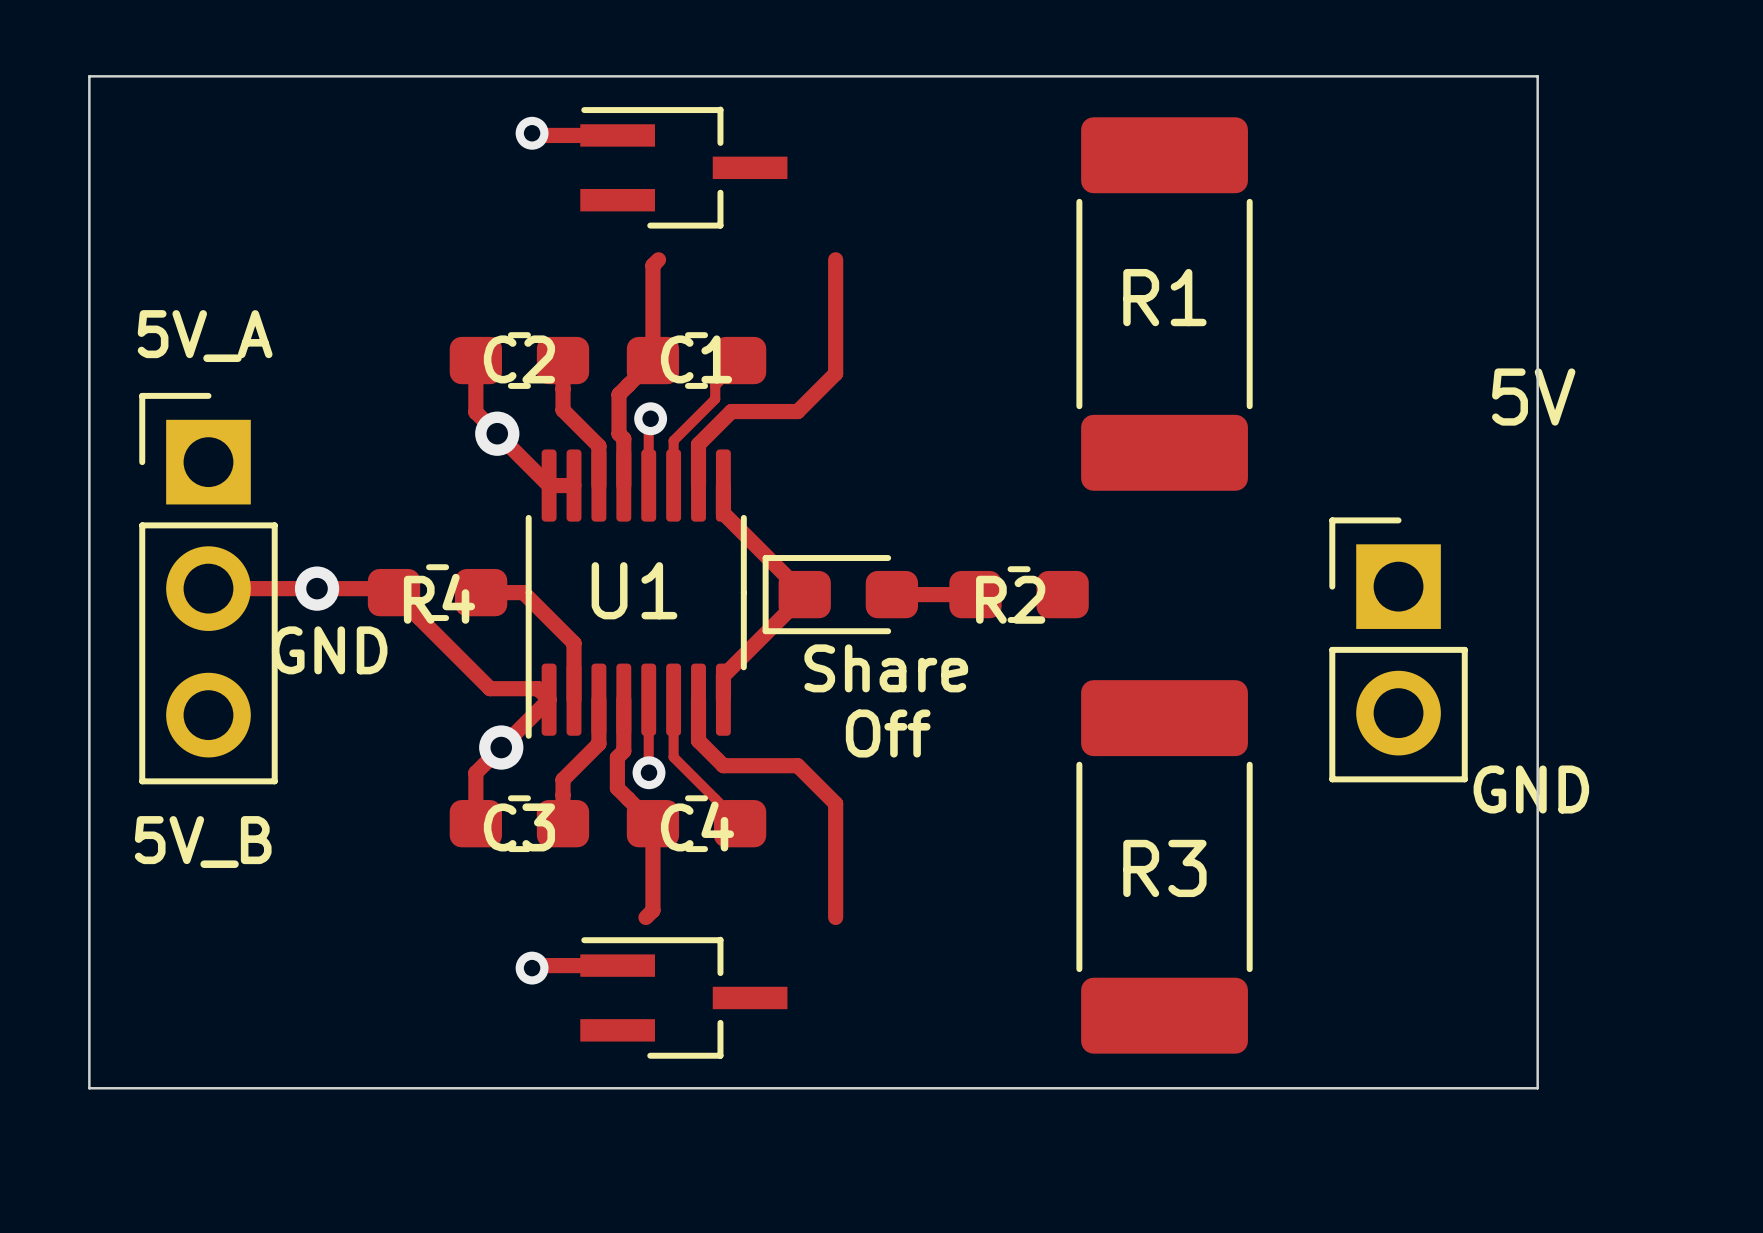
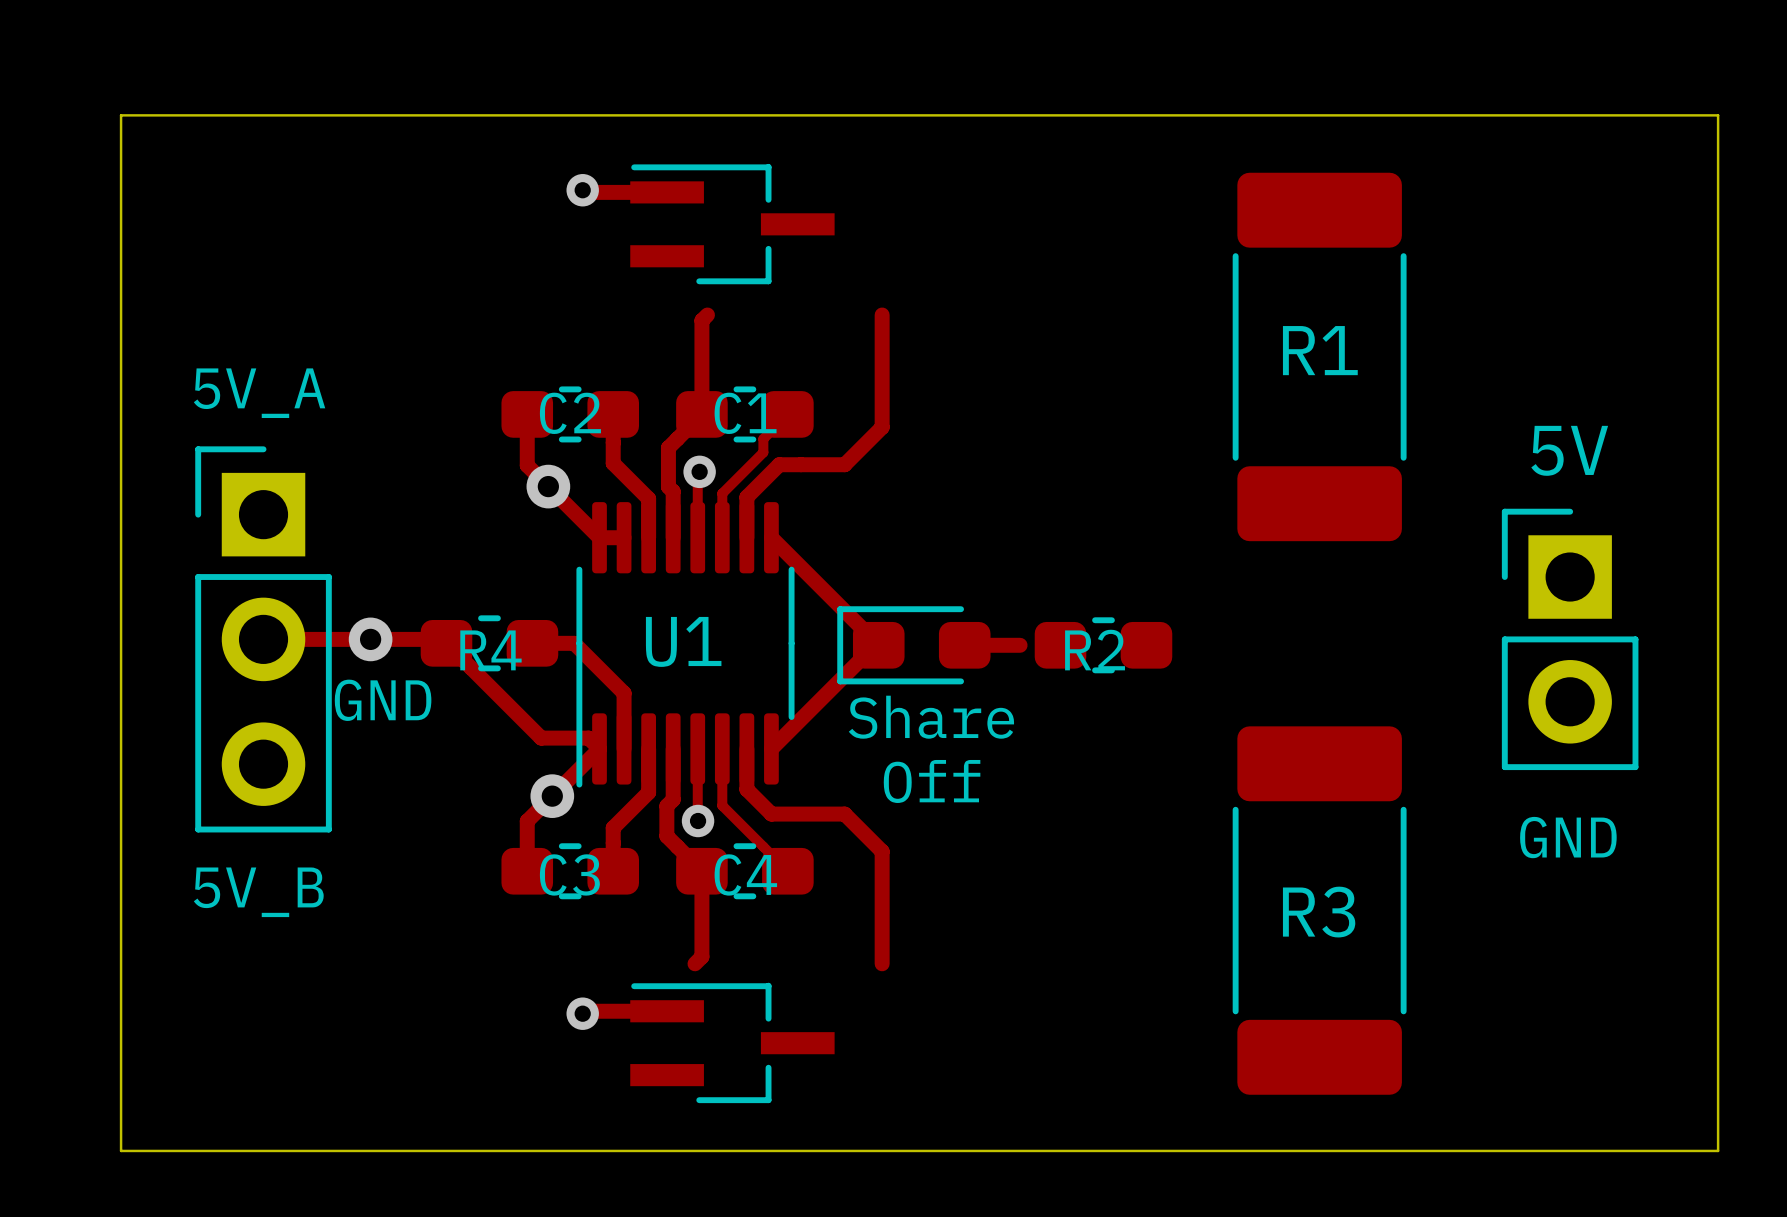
board edge: (89, 76) (89, 1088) (1537, 1088) (1537, 76) (89, 76) -> (121, 115) (121, 1150) (1718, 1150) (1718, 115) (121, 115)
R1 position: (1164, 304) -> (1319, 356)
track: (723, 485) (723, 513) (804, 594) (723, 675) (723, 699) -> (771, 537) (878, 645)
track: none -> (878, 645) (875, 645) (771, 748)
part position: (840, 594) -> (913, 645)
R2 position: (1019, 594) -> (1103, 645)
part position: (1398, 649) -> (1570, 639)
R3 position: (1164, 866) -> (1319, 910)

